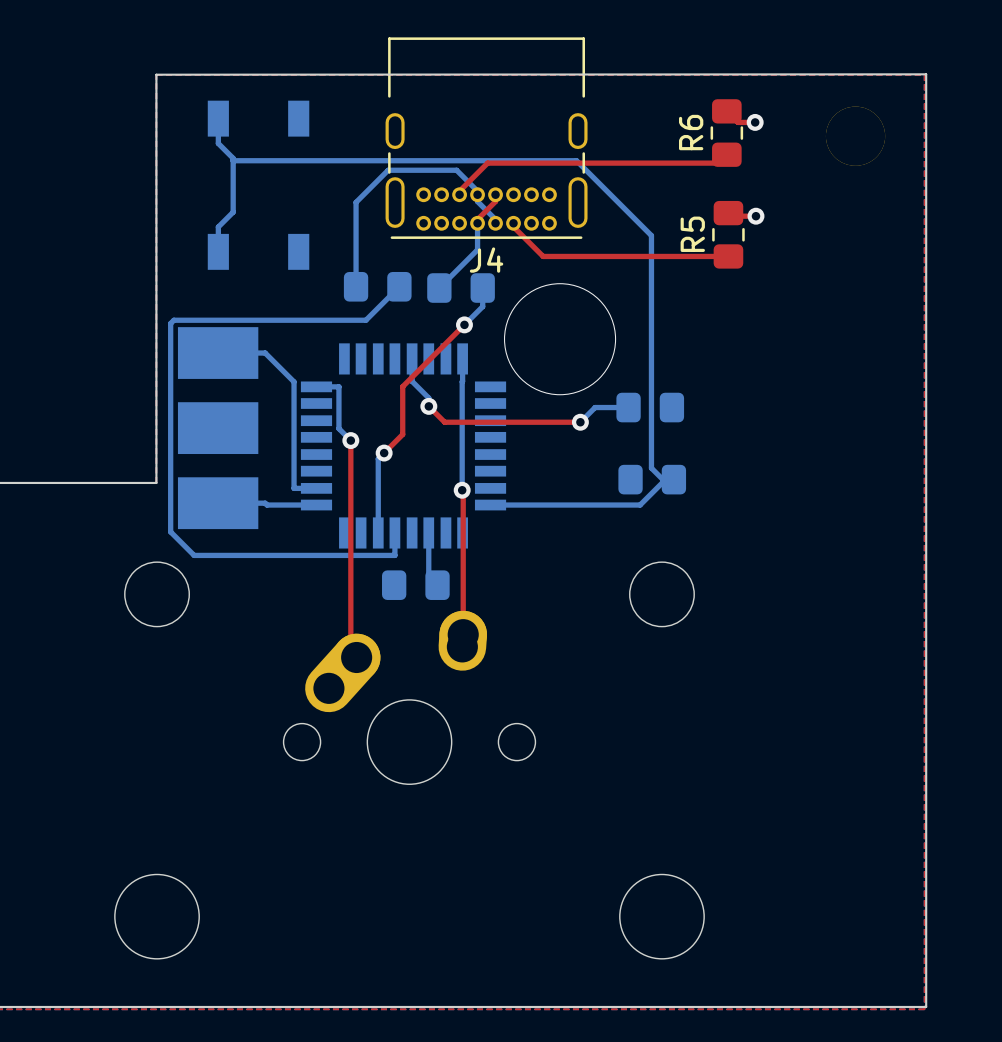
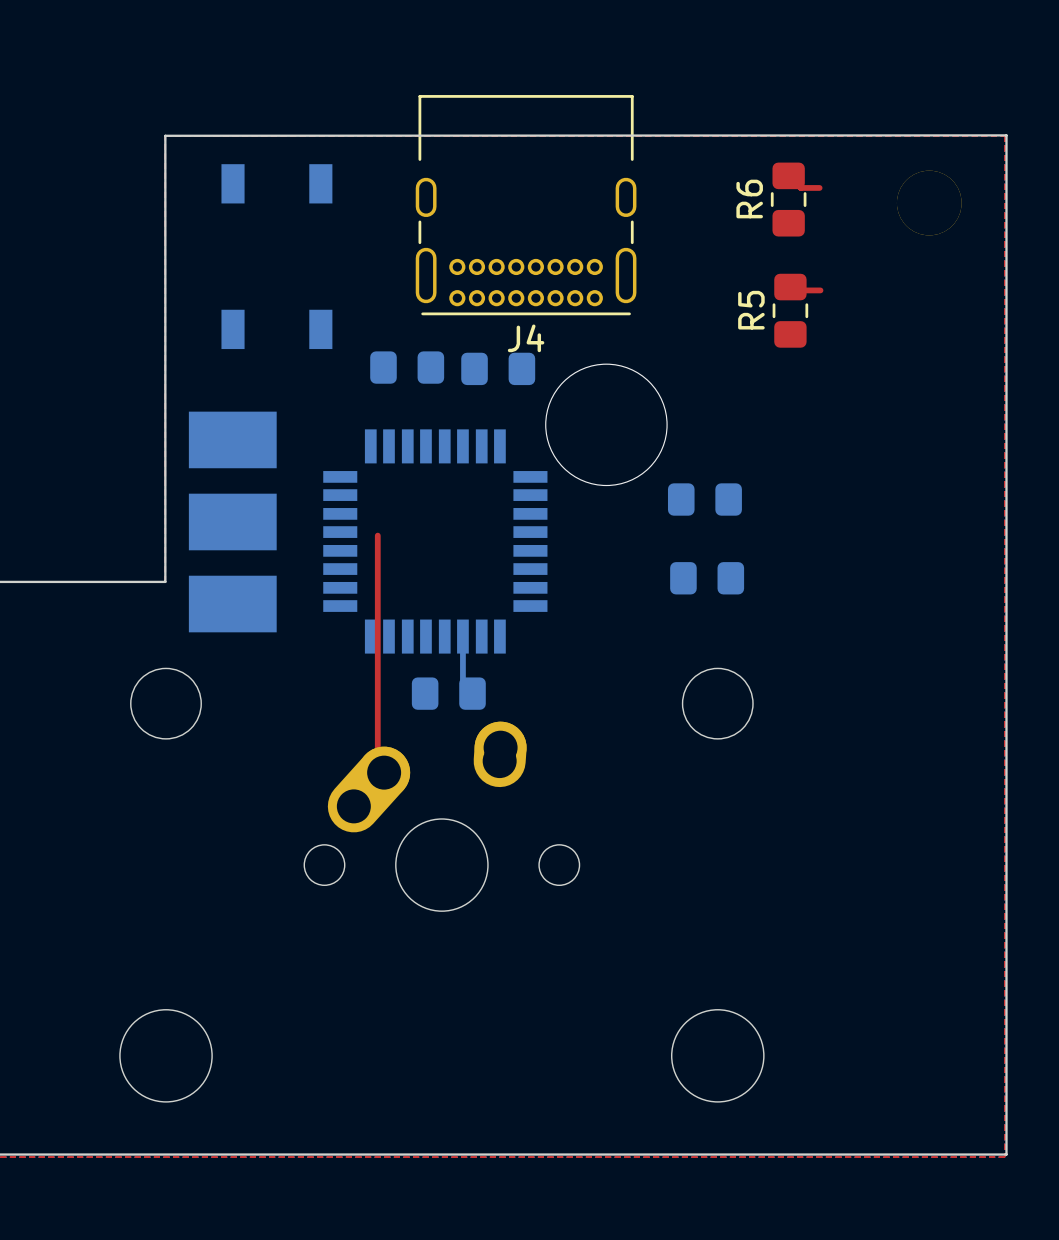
bottom track: (218, 118) (218, 143) (233, 158) (233, 212) (218, 227) (218, 251) -> none
via: (755, 122) -> none
top track: (726, 154) (718, 163) (487, 163) (459, 191) (459, 194) -> none
bottom track: (233, 160) (576, 160) (651, 235) (651, 468) (664, 480) -> none
top track: (495, 194) (495, 201) (477, 219) (477, 223) -> none
via: (755, 216) -> none
bottom track: (477, 223) (477, 249) (439, 288) -> none
bottom track: (495, 223) (495, 219) (477, 201) (477, 191) (456, 170) (388, 170) (356, 202) (356, 286) -> none
top track: (513, 223) (513, 226) (543, 256) (728, 256) -> none
bottom track: (399, 286) (365, 320) (173, 320) (170, 323) (170, 531) (194, 555) (394, 555) (394, 532) -> none
bottom track: (482, 288) (482, 306) (464, 324) -> none
top track: (464, 324) (402, 386) (402, 434) (384, 453) -> none
via: (464, 324) -> none
bottom track: (218, 353) (265, 353) (294, 381) (294, 488) (316, 488) -> none
bottom track: (412, 358) (412, 381) (428, 398) (428, 406) -> none
bottom track: (462, 358) (462, 490) -> none
bottom track: (316, 386) (338, 386) (338, 428) (350, 440) -> none
top track: (428, 406) (444, 422) (580, 422) -> none
via: (428, 406) -> none
bottom track: (628, 407) (595, 407) (580, 422) -> none
via: (580, 422) -> none
via: (350, 440) -> none
bottom track: (384, 453) (378, 458) (378, 532) -> none
via: (384, 453) -> none
bottom track: (664, 480) (640, 505) (490, 505) -> none
top track: (462, 490) (463, 634) -> none
via: (462, 490) -> none
bottom track: (218, 503) (316, 505) -> none

